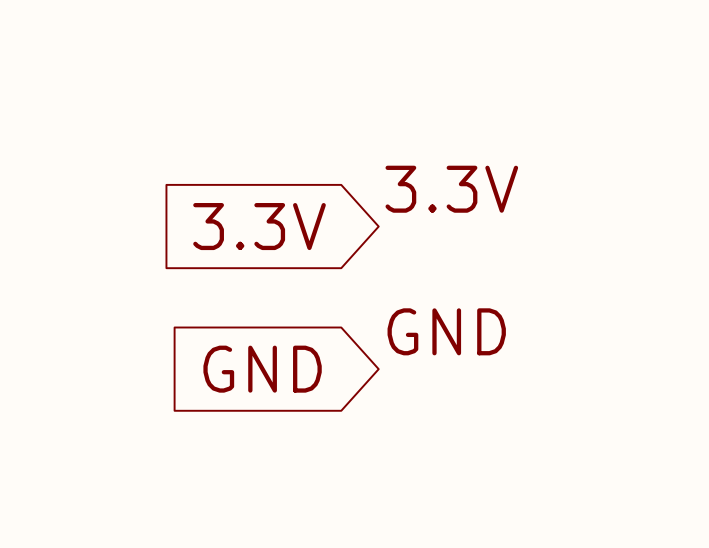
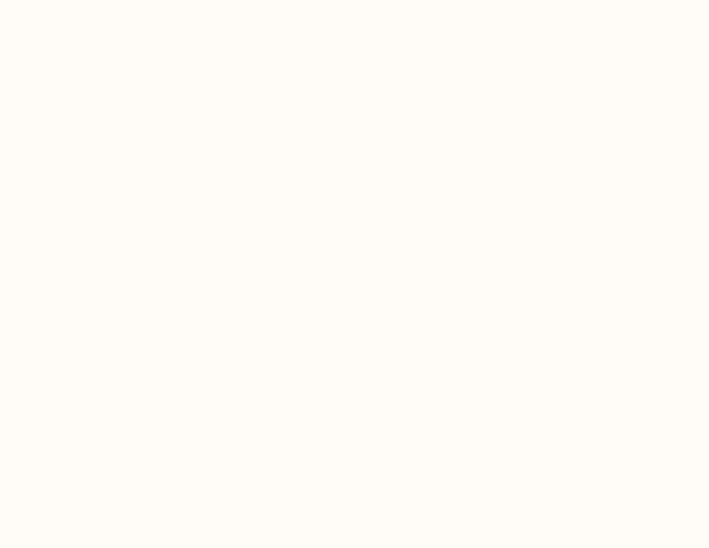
label: 3.3V (451, 189) -> none
global label: 3.3V (259, 226) -> none
label: GND (446, 331) -> none
global label: GND (262, 369) -> none

